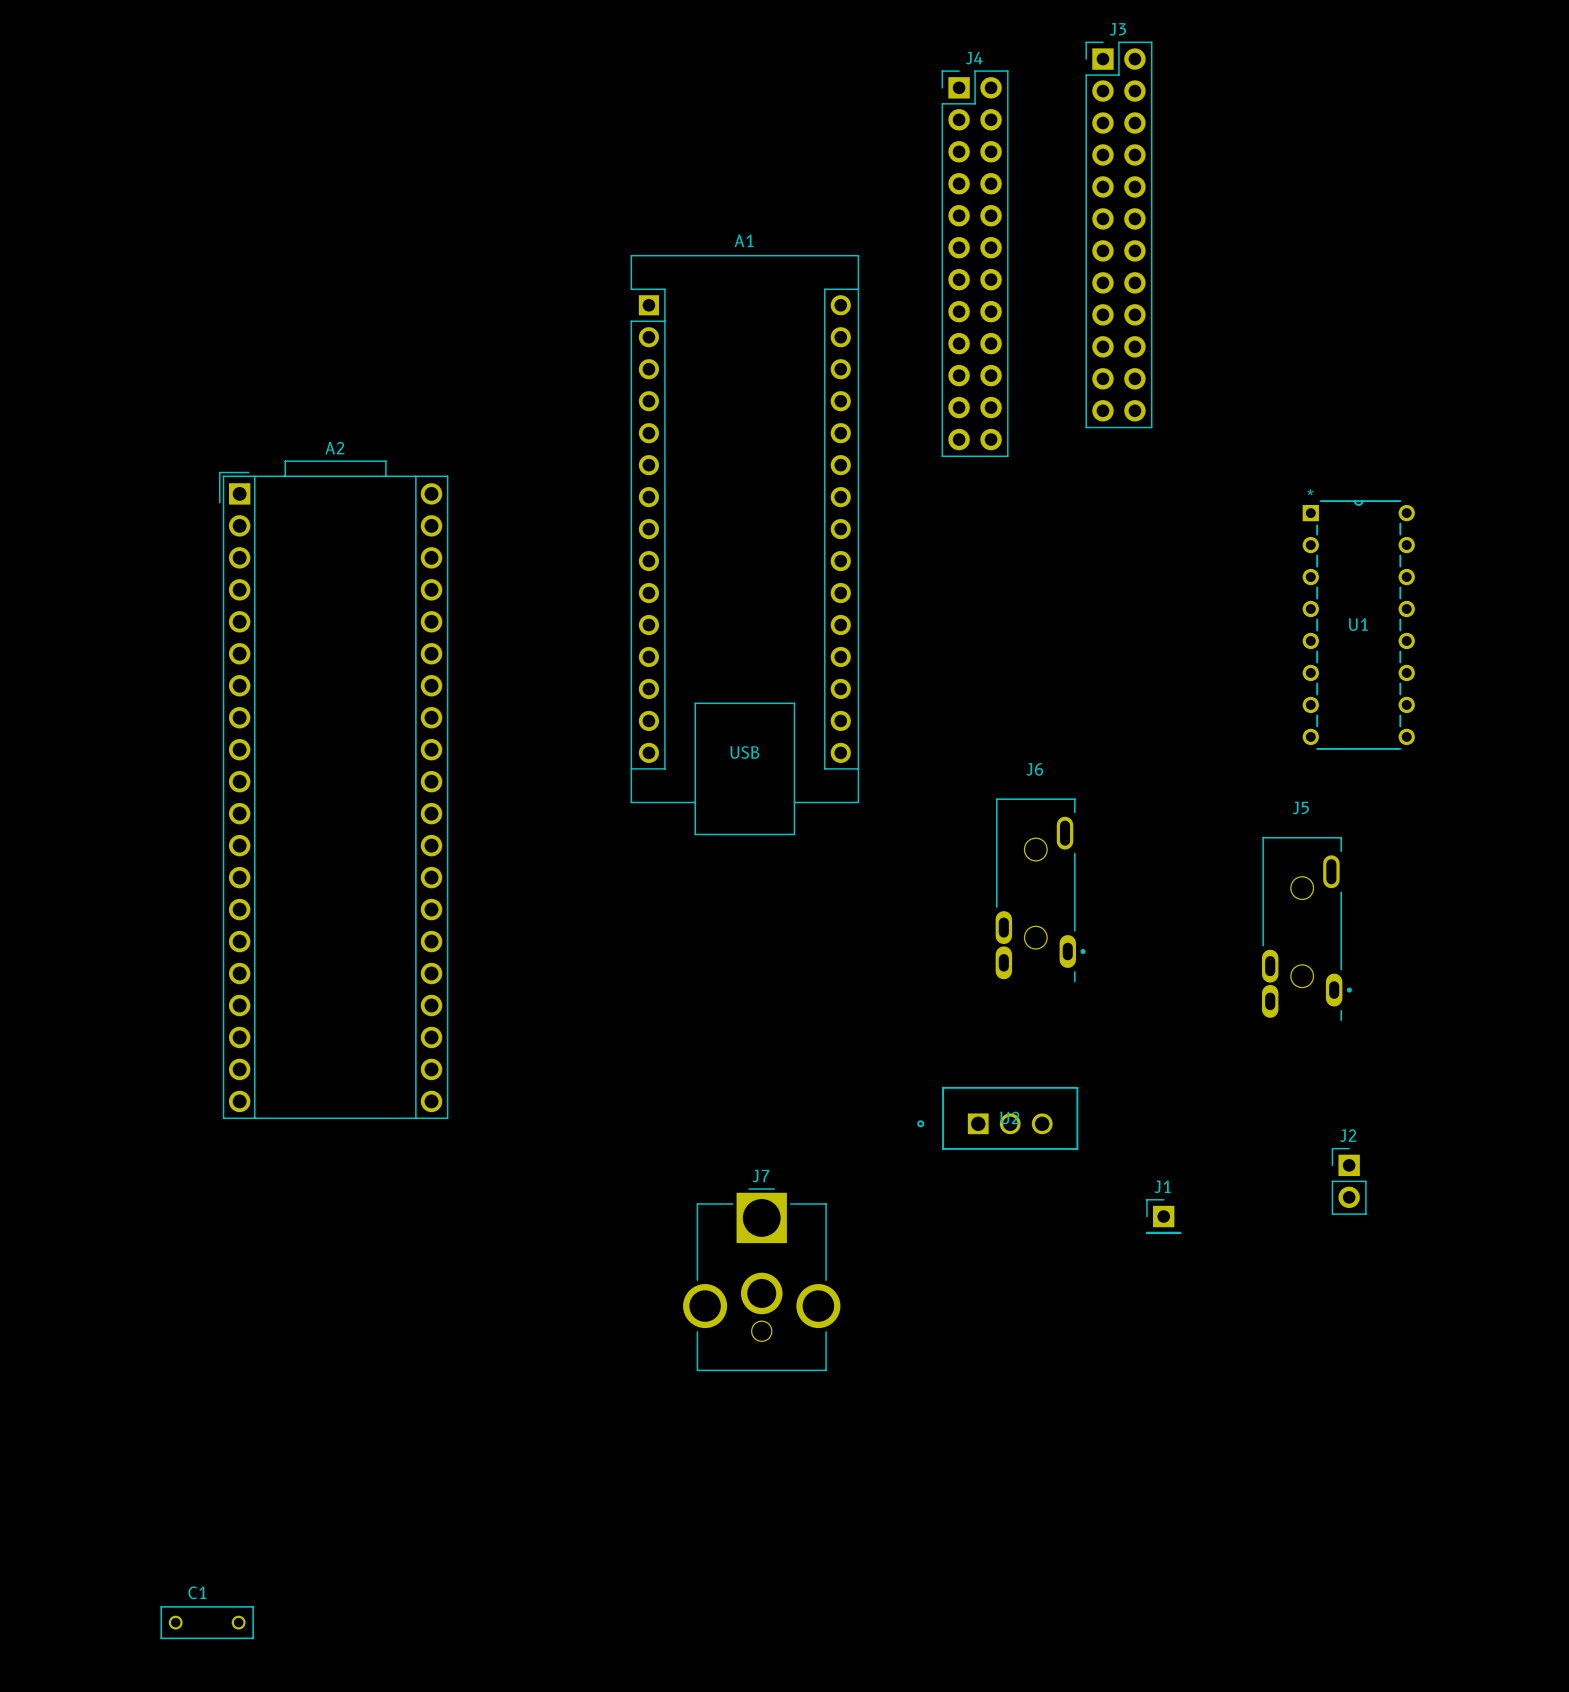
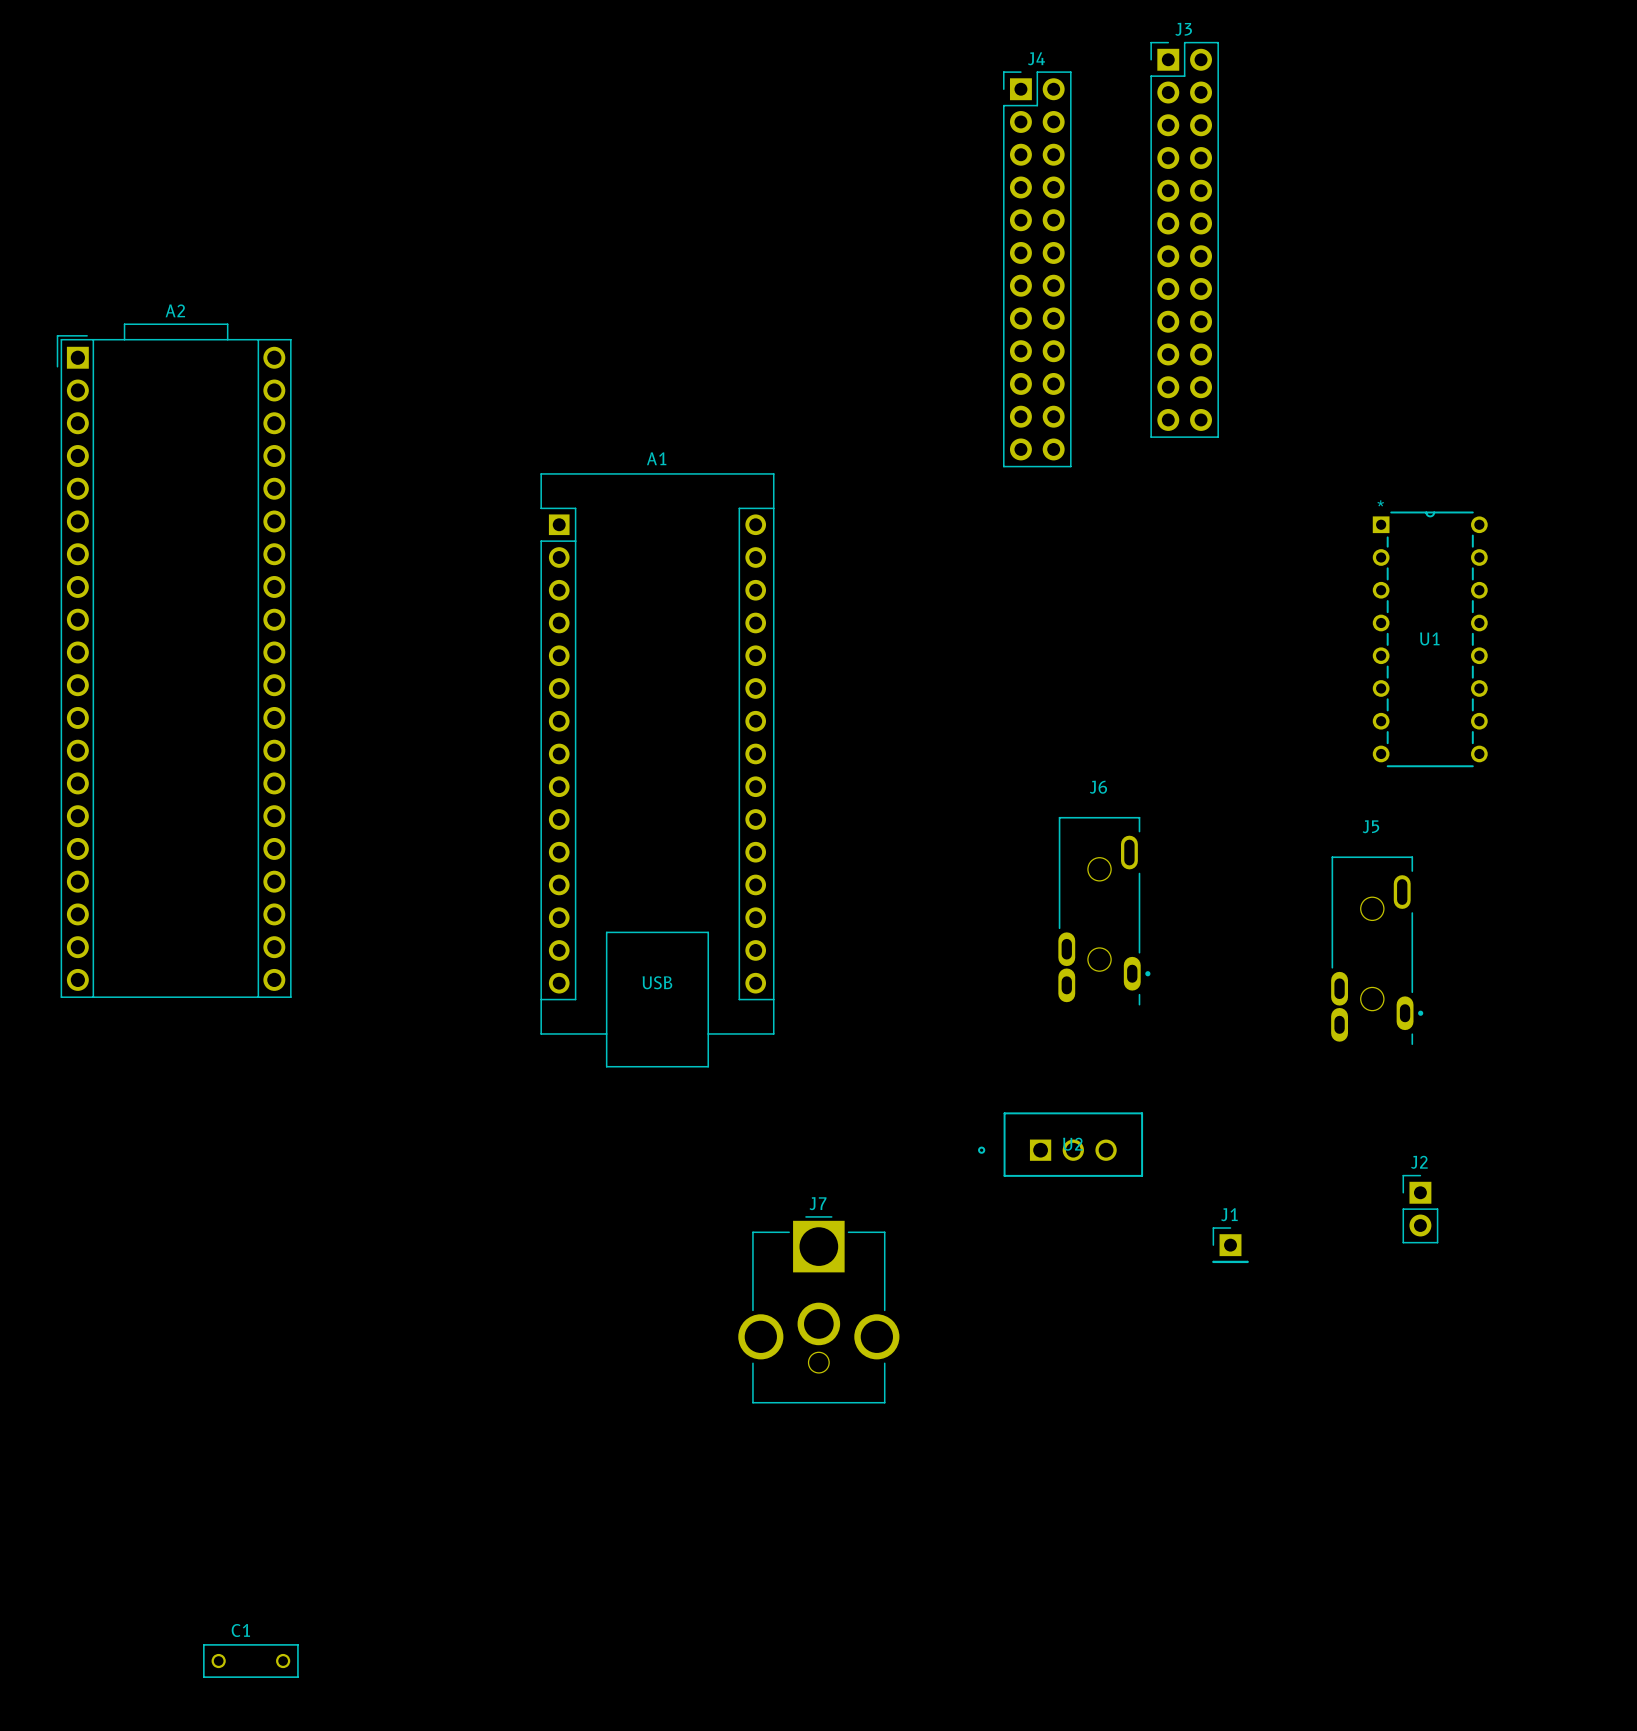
A1 position: (744, 545) -> (657, 770)
A2 position: (333, 789) -> (174, 660)

